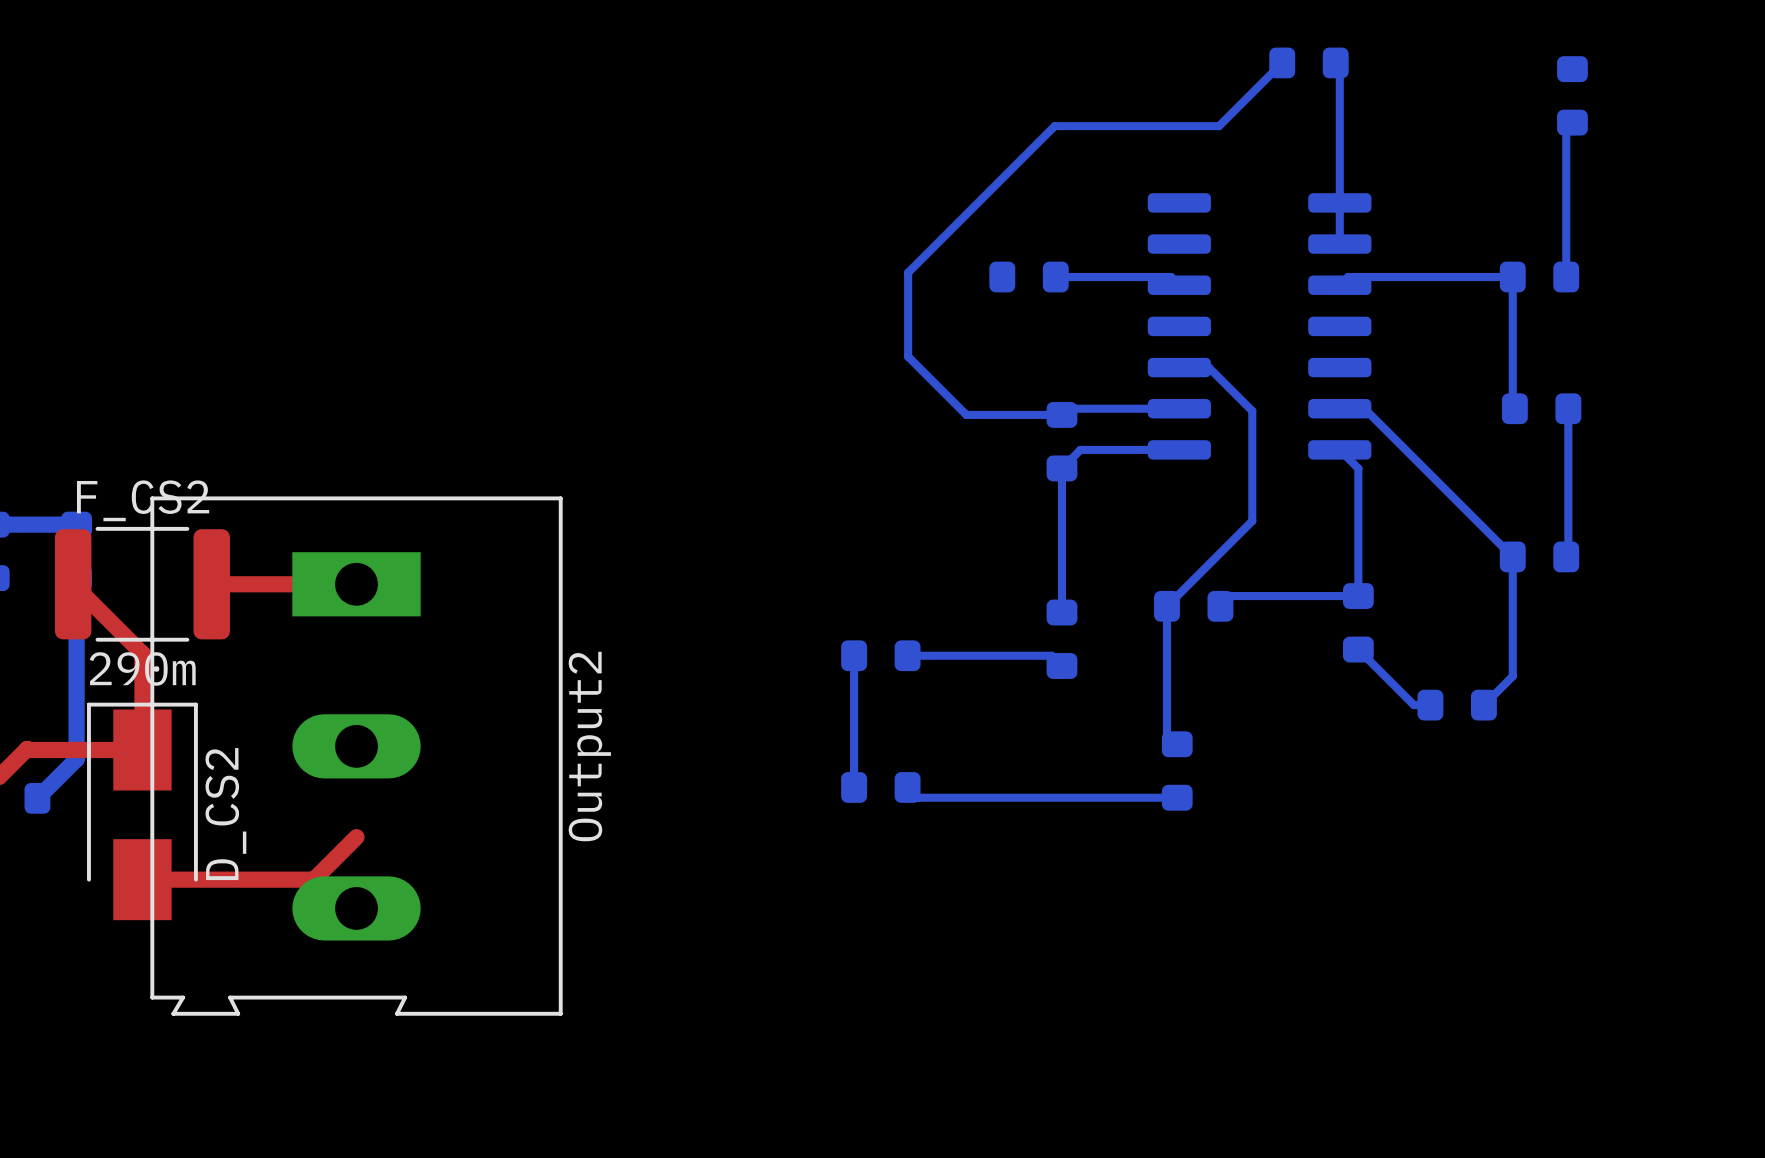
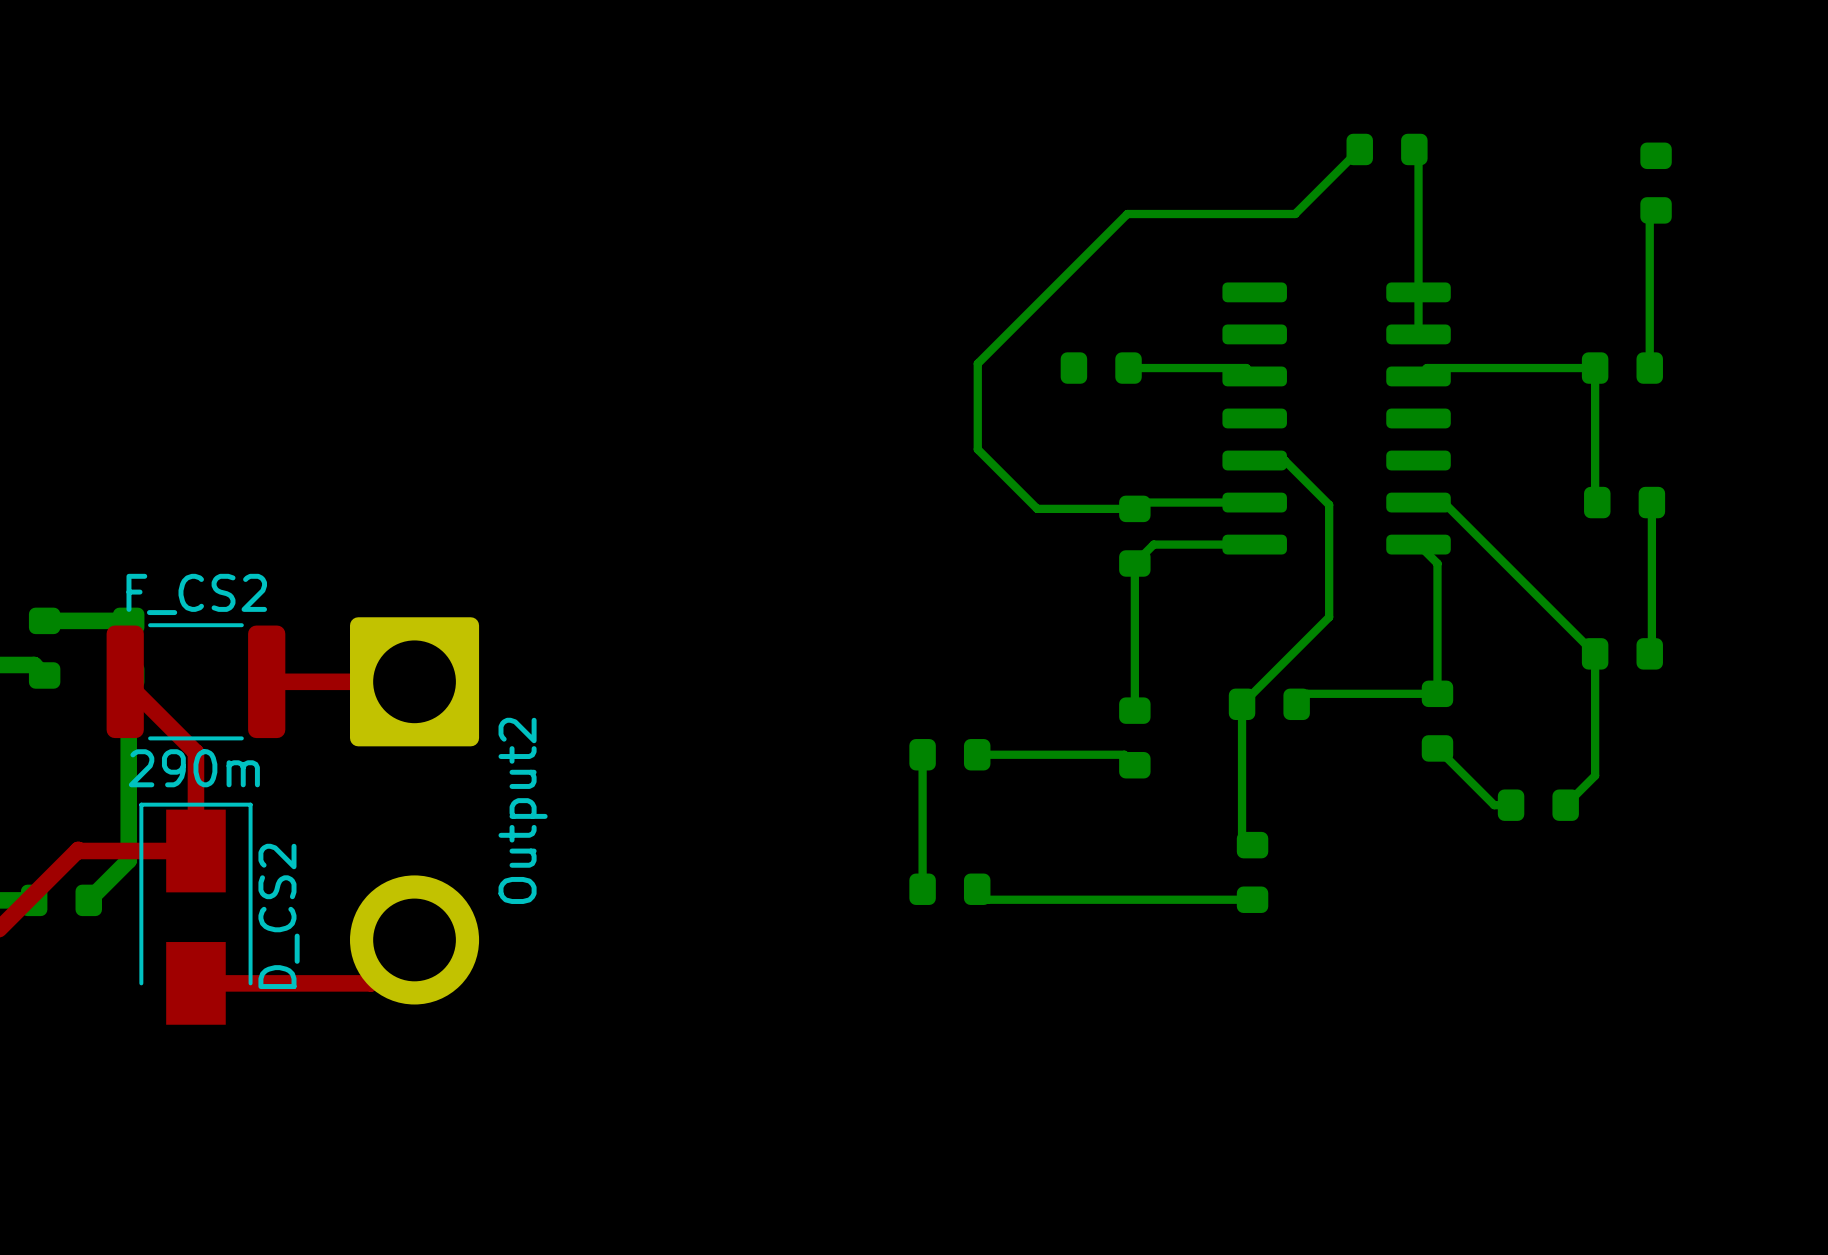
Output2 footprint: [150, 496, 563, 1016] -> [349, 617, 480, 1005]
Output2 name position: Output2 (589, 746) -> Output2 (523, 810)

